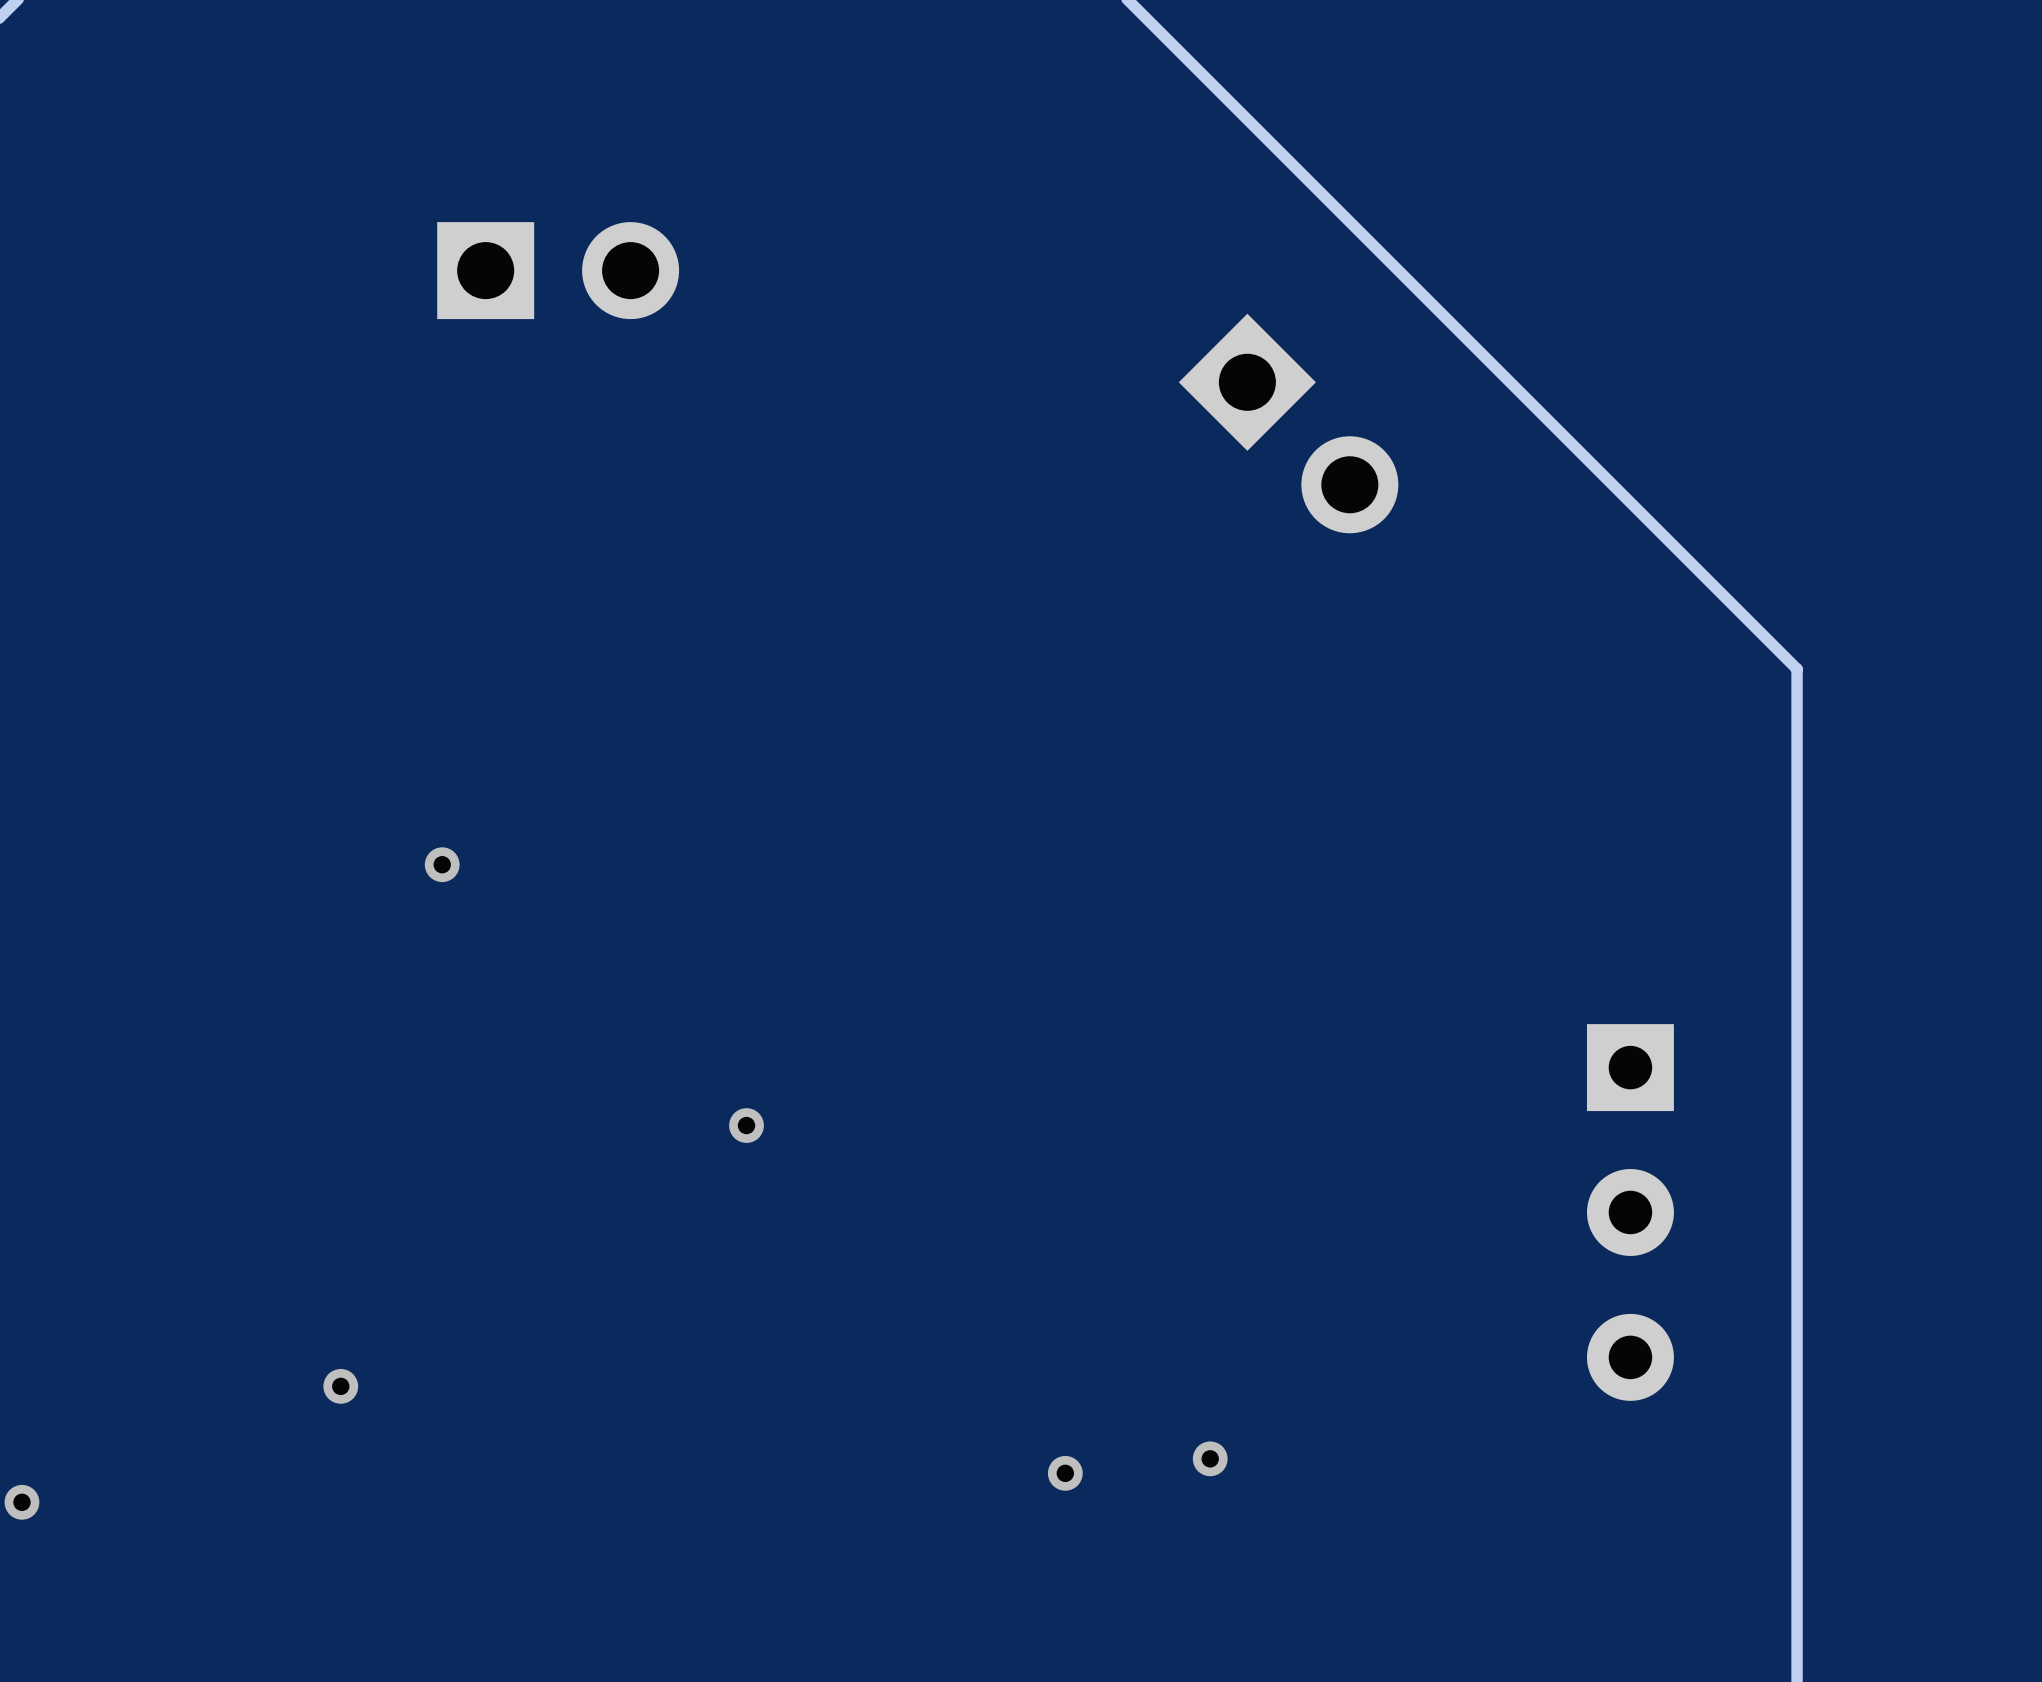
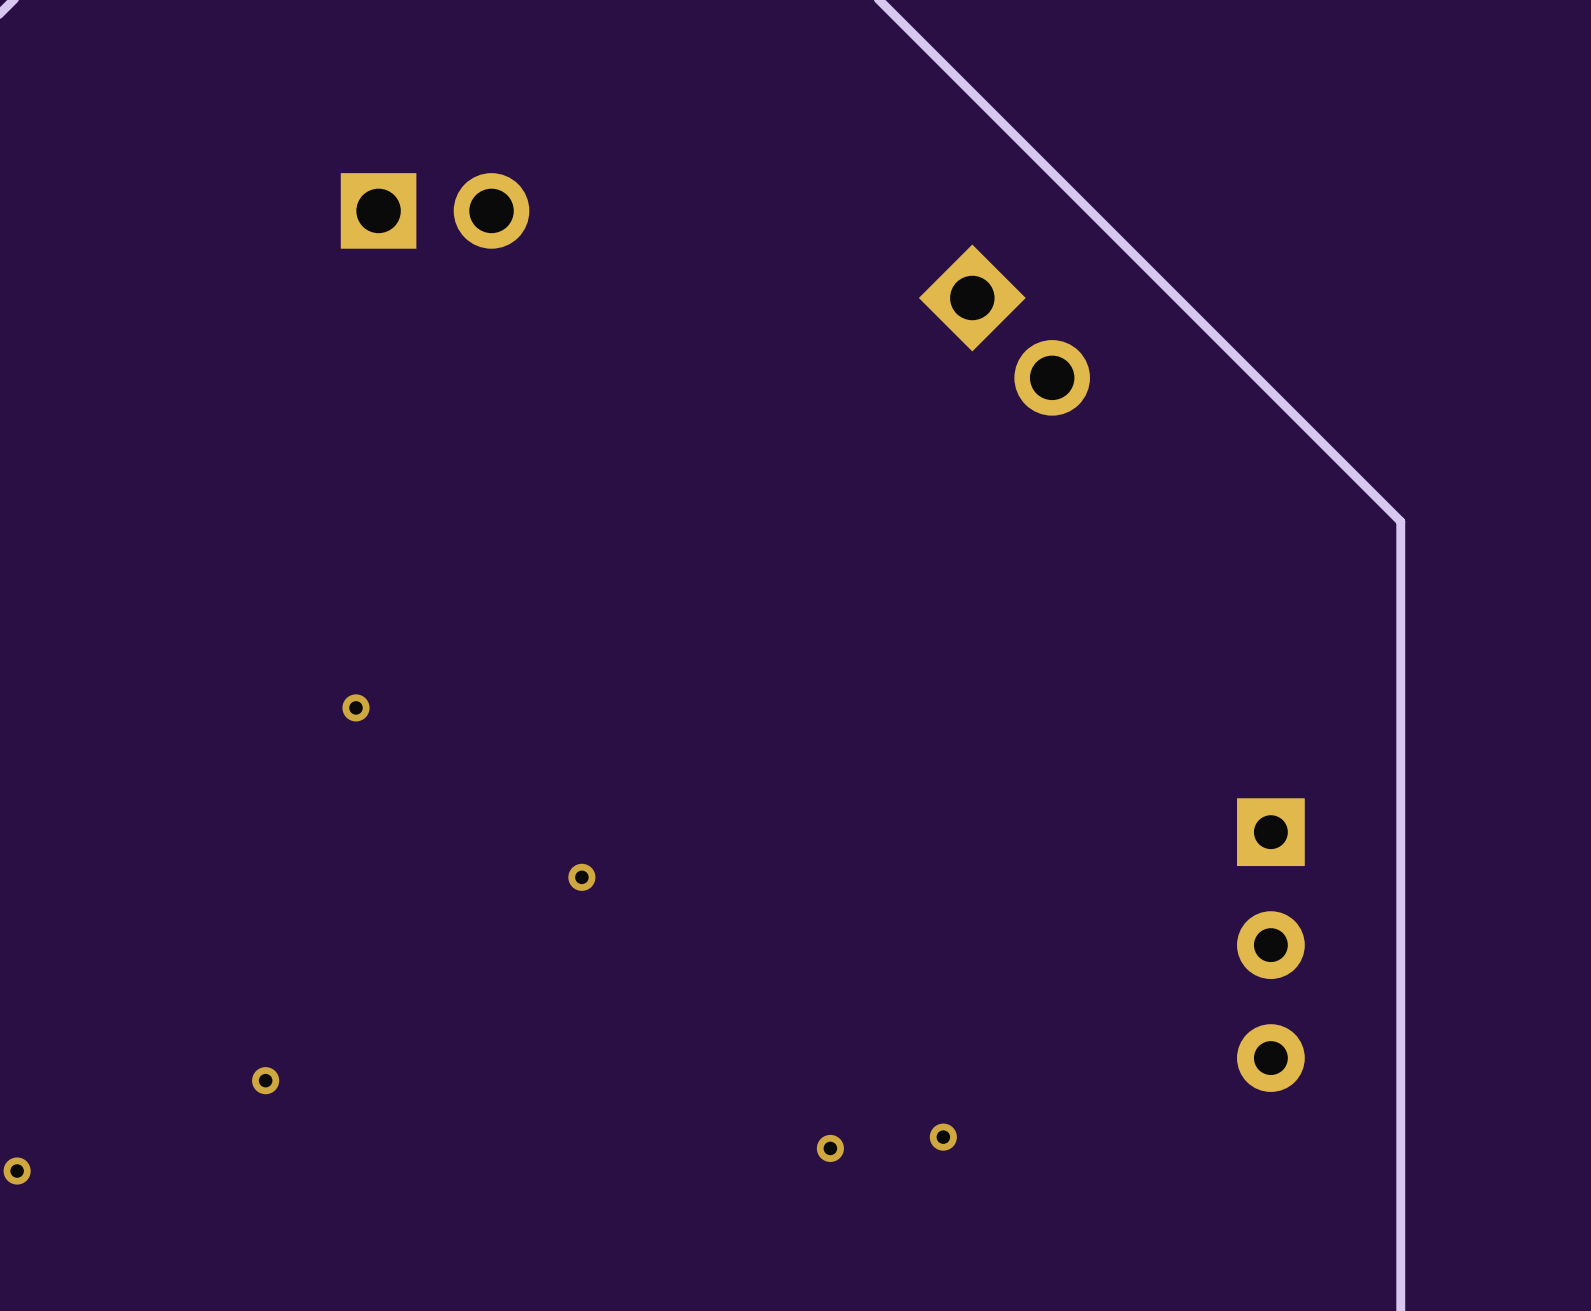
via position: (442, 864) -> (355, 707)

